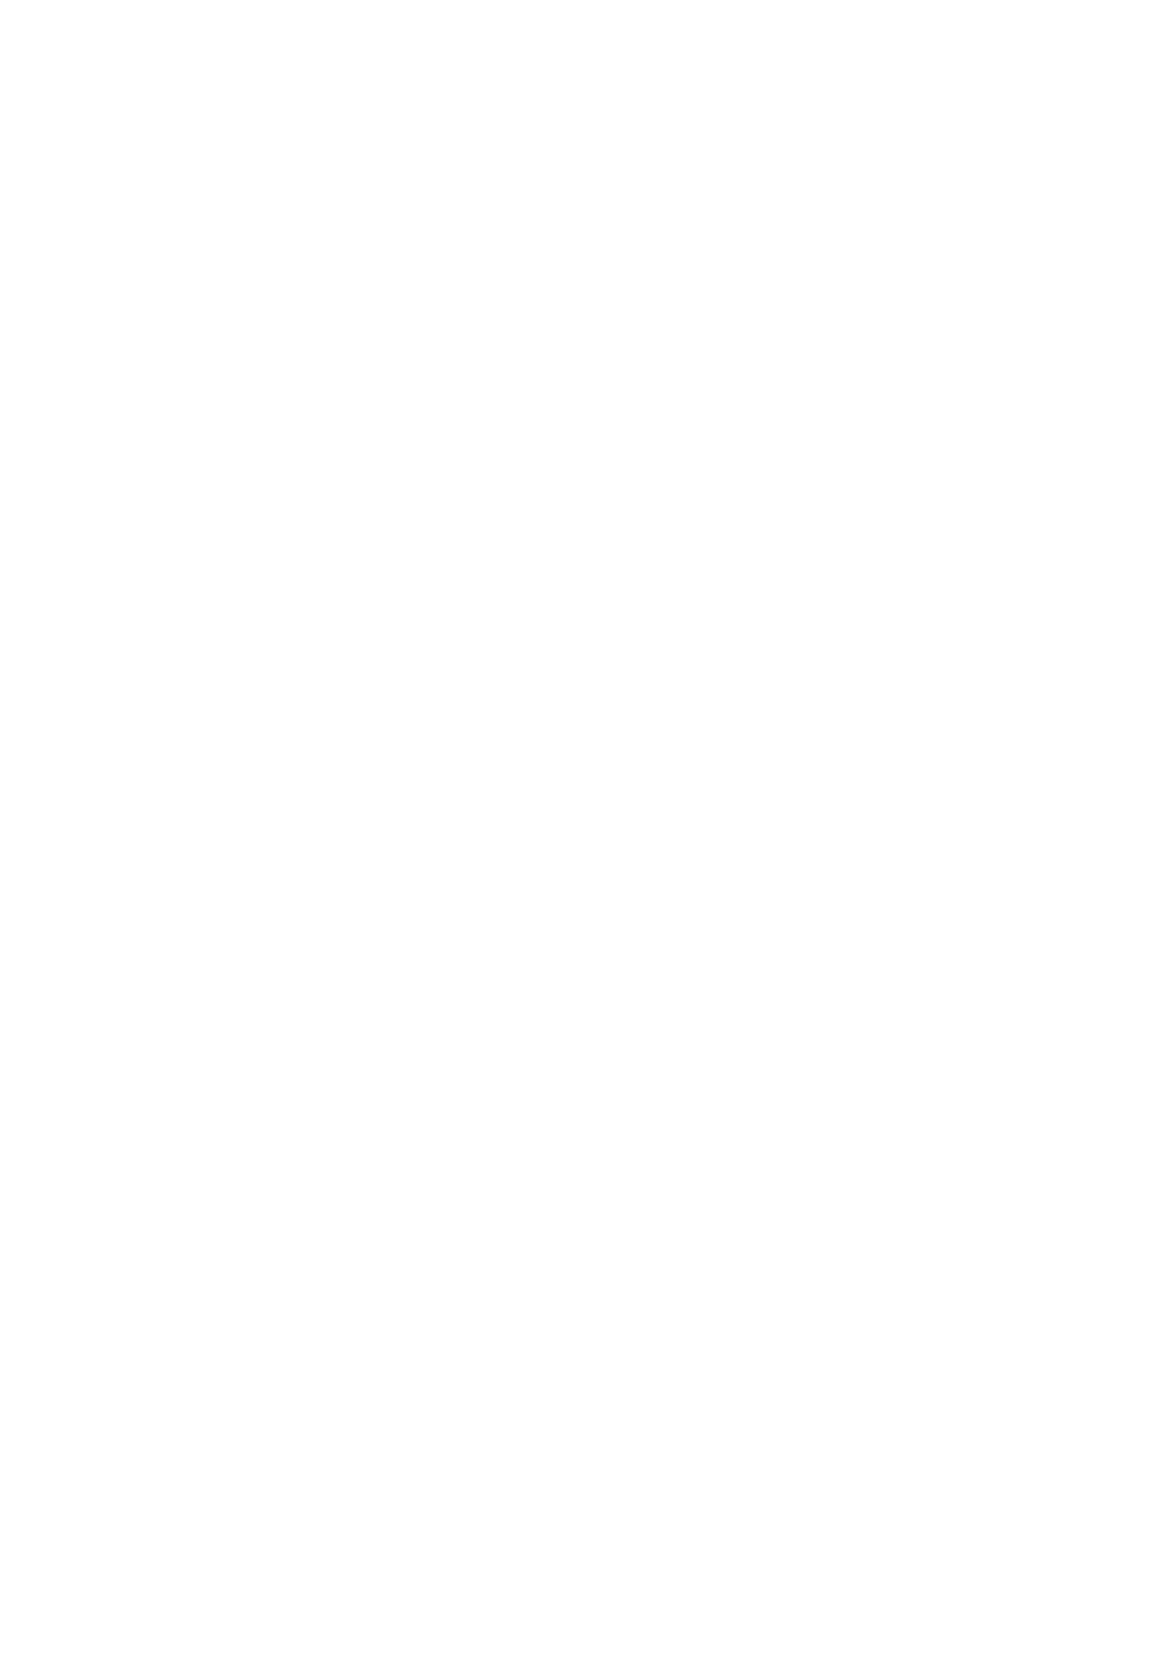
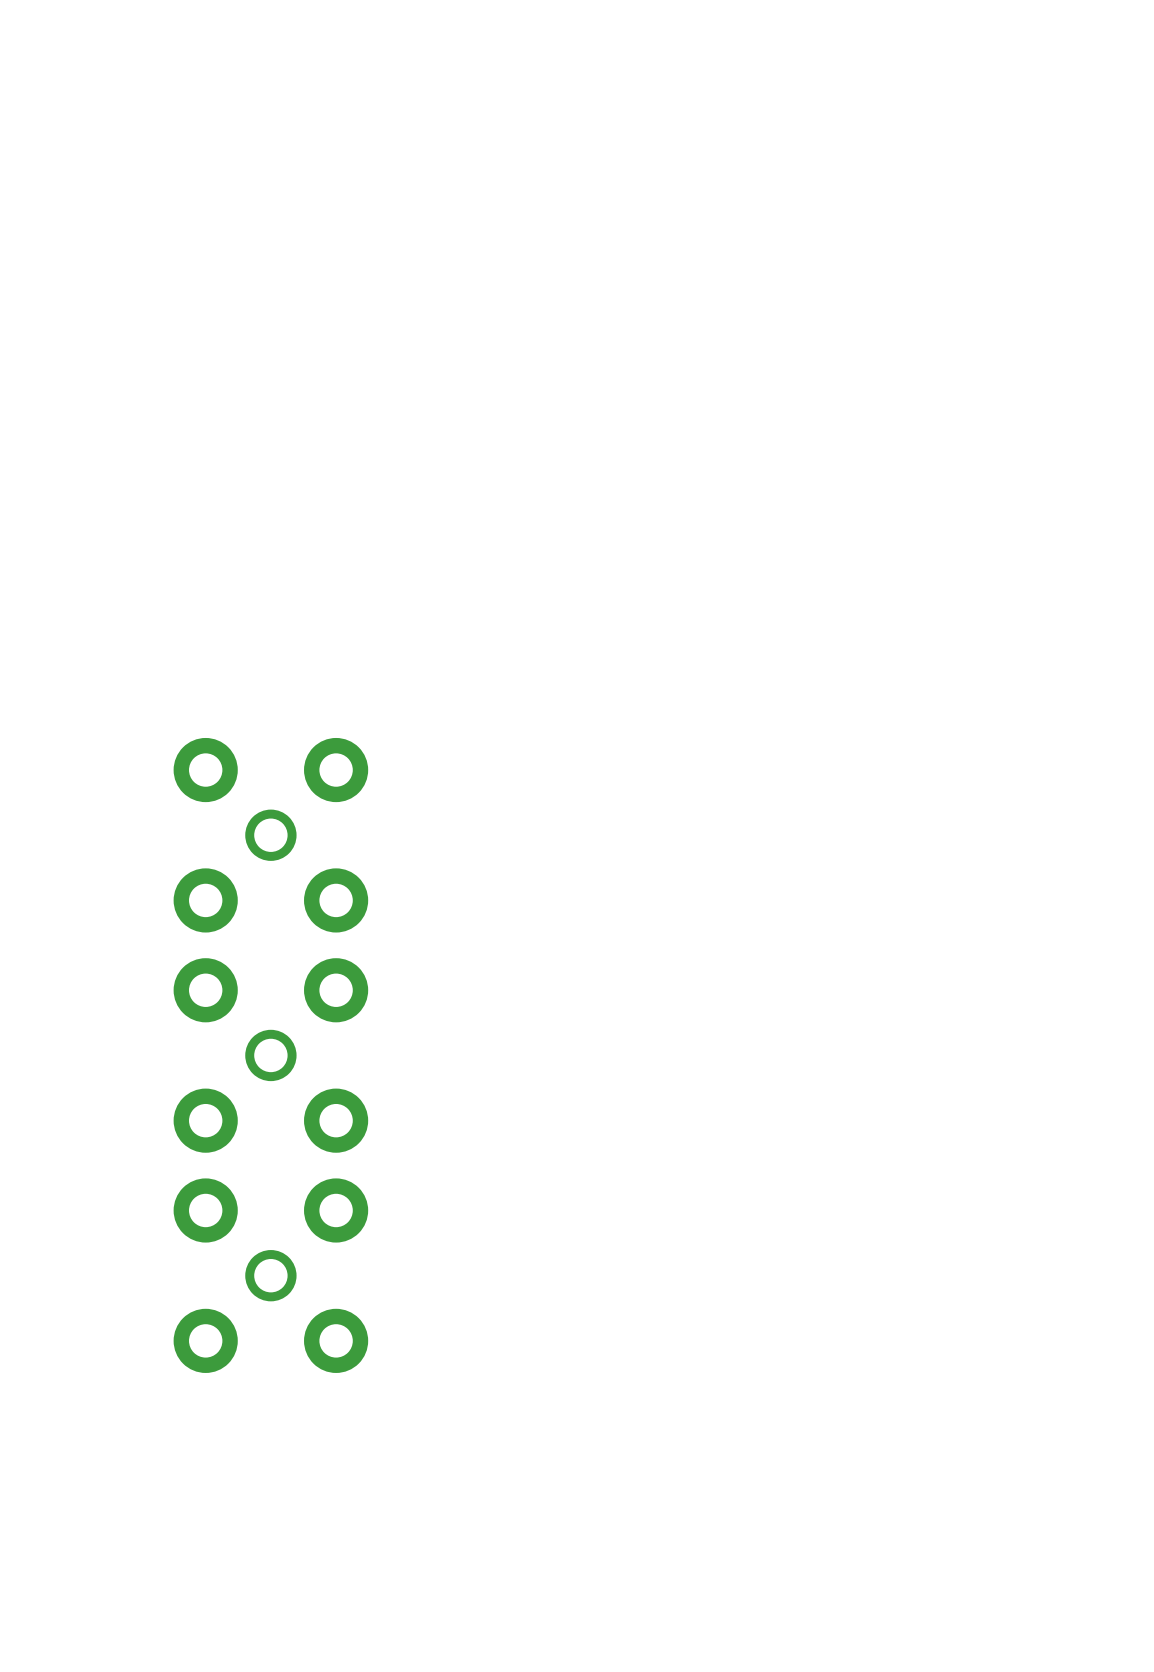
part: none -> (270, 835)
part: none -> (270, 1055)
part: none -> (270, 1275)

